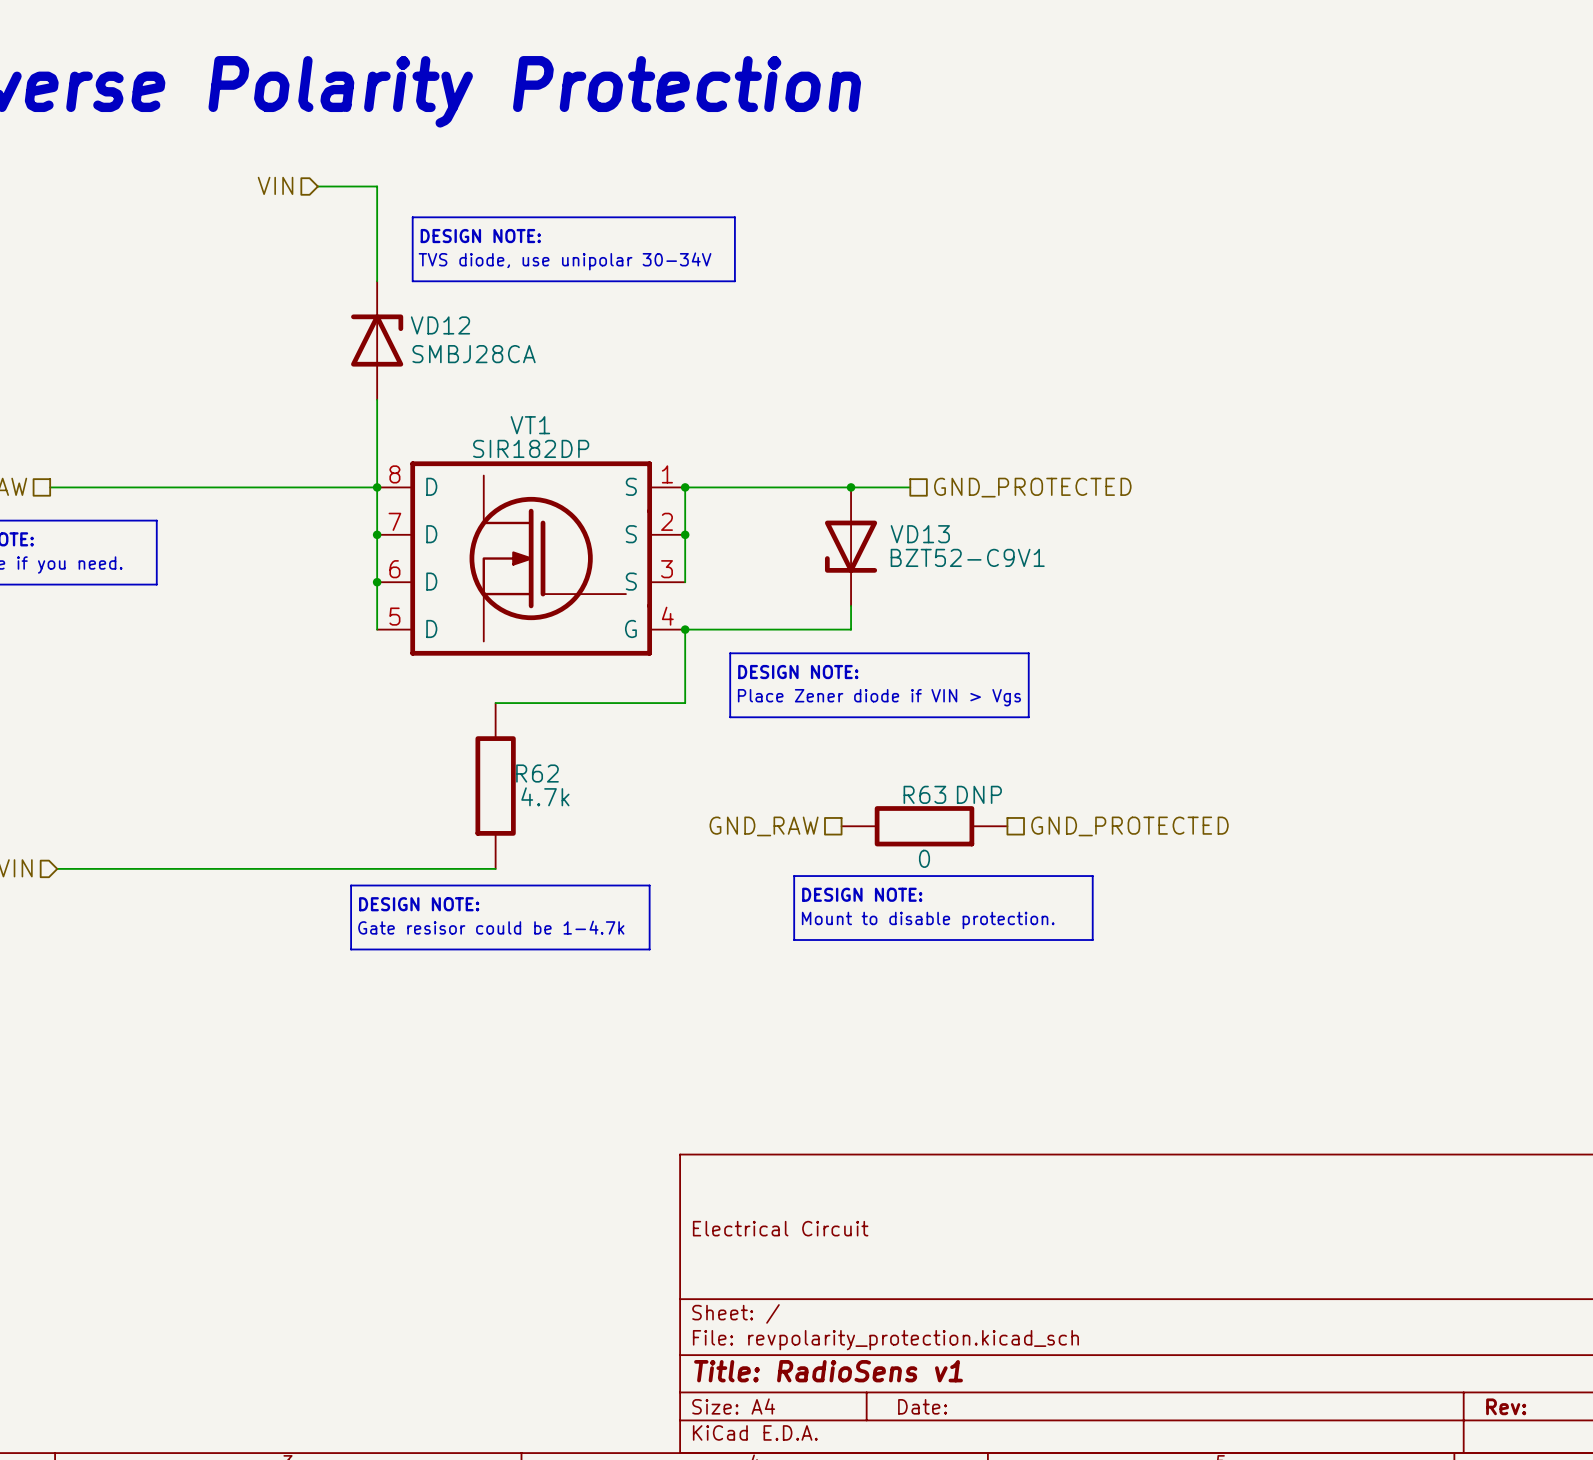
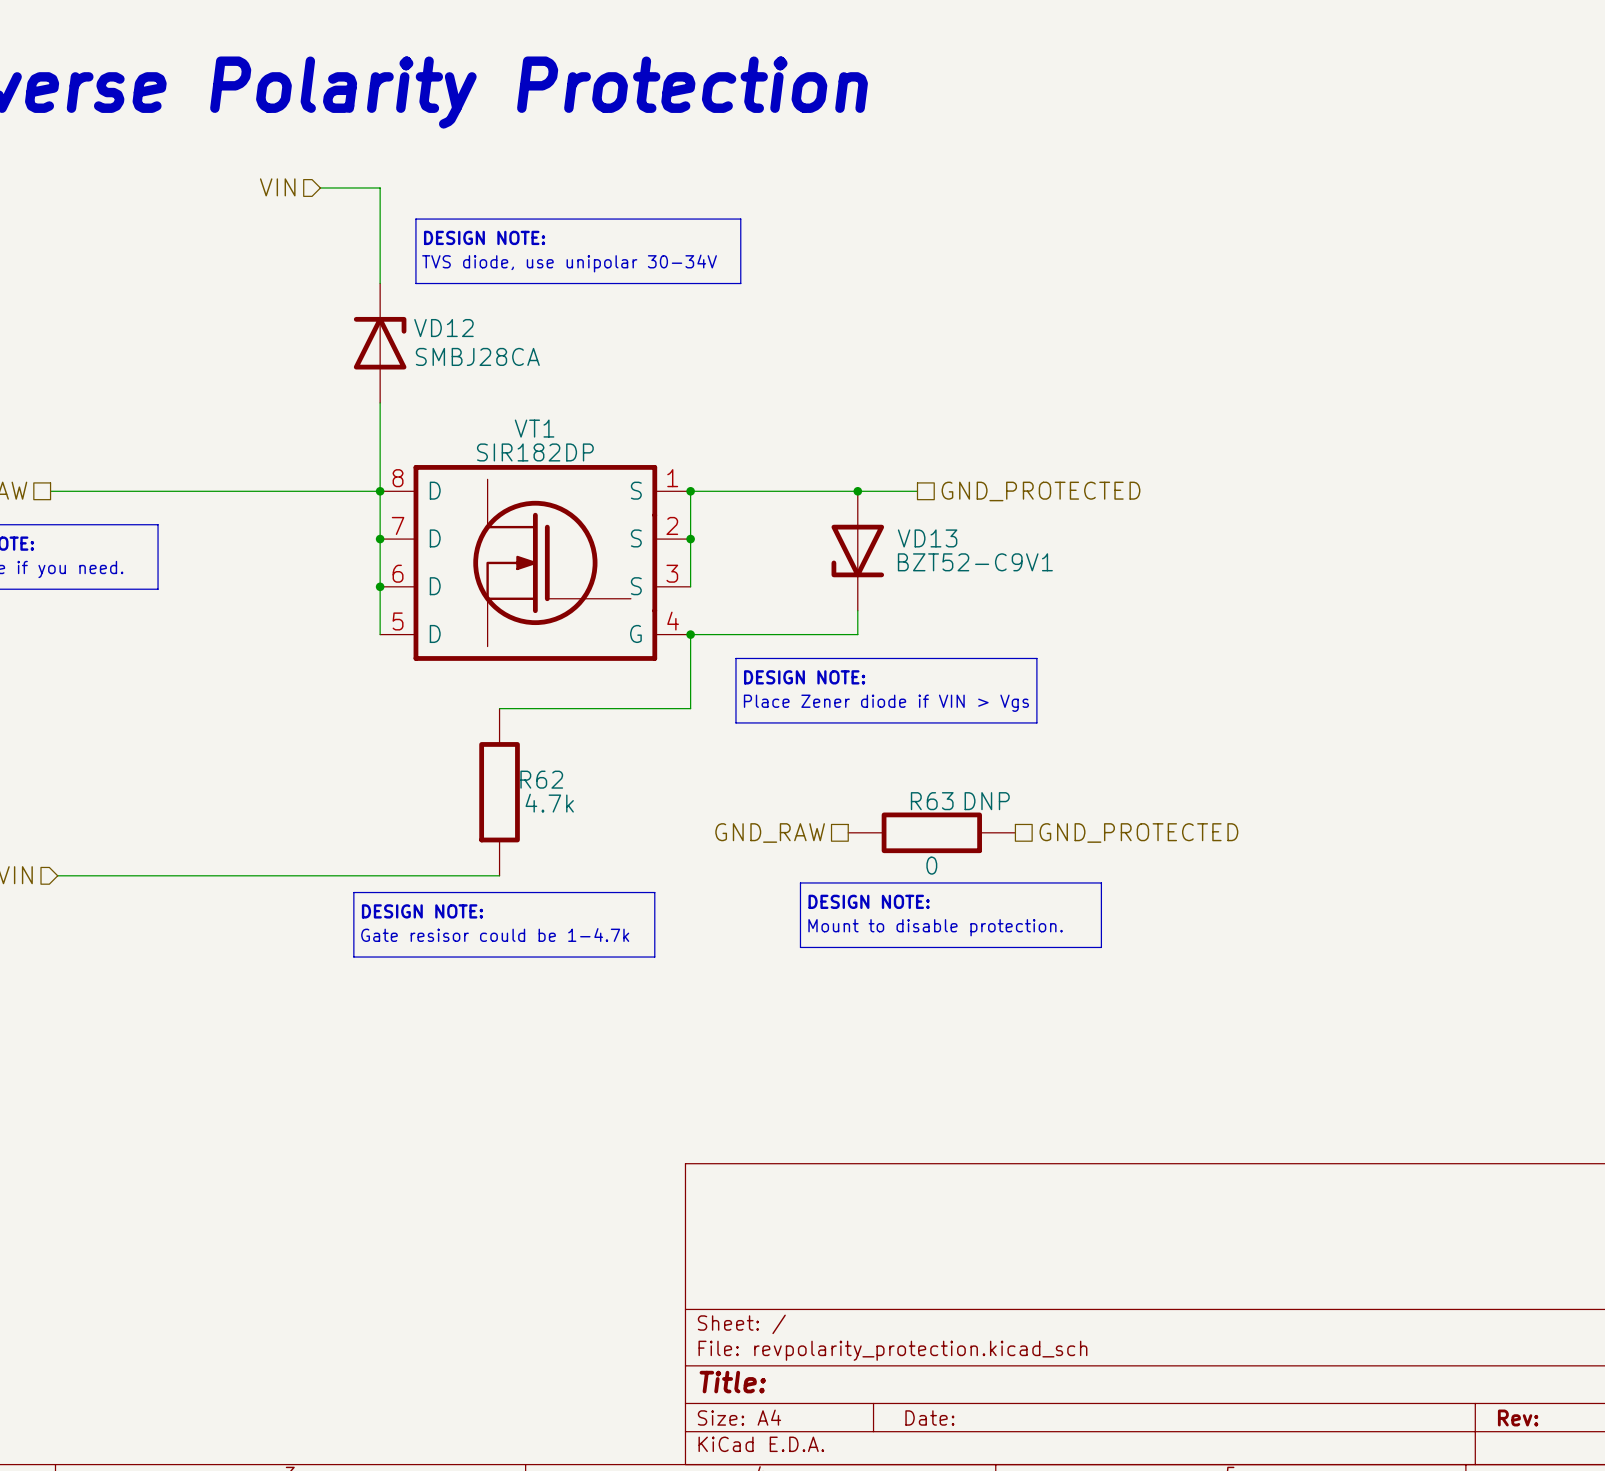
title block: Electrical Circuit (780, 1228) -> none
title block: Title: RadioSens v1 (828, 1371) -> Title: (732, 1382)

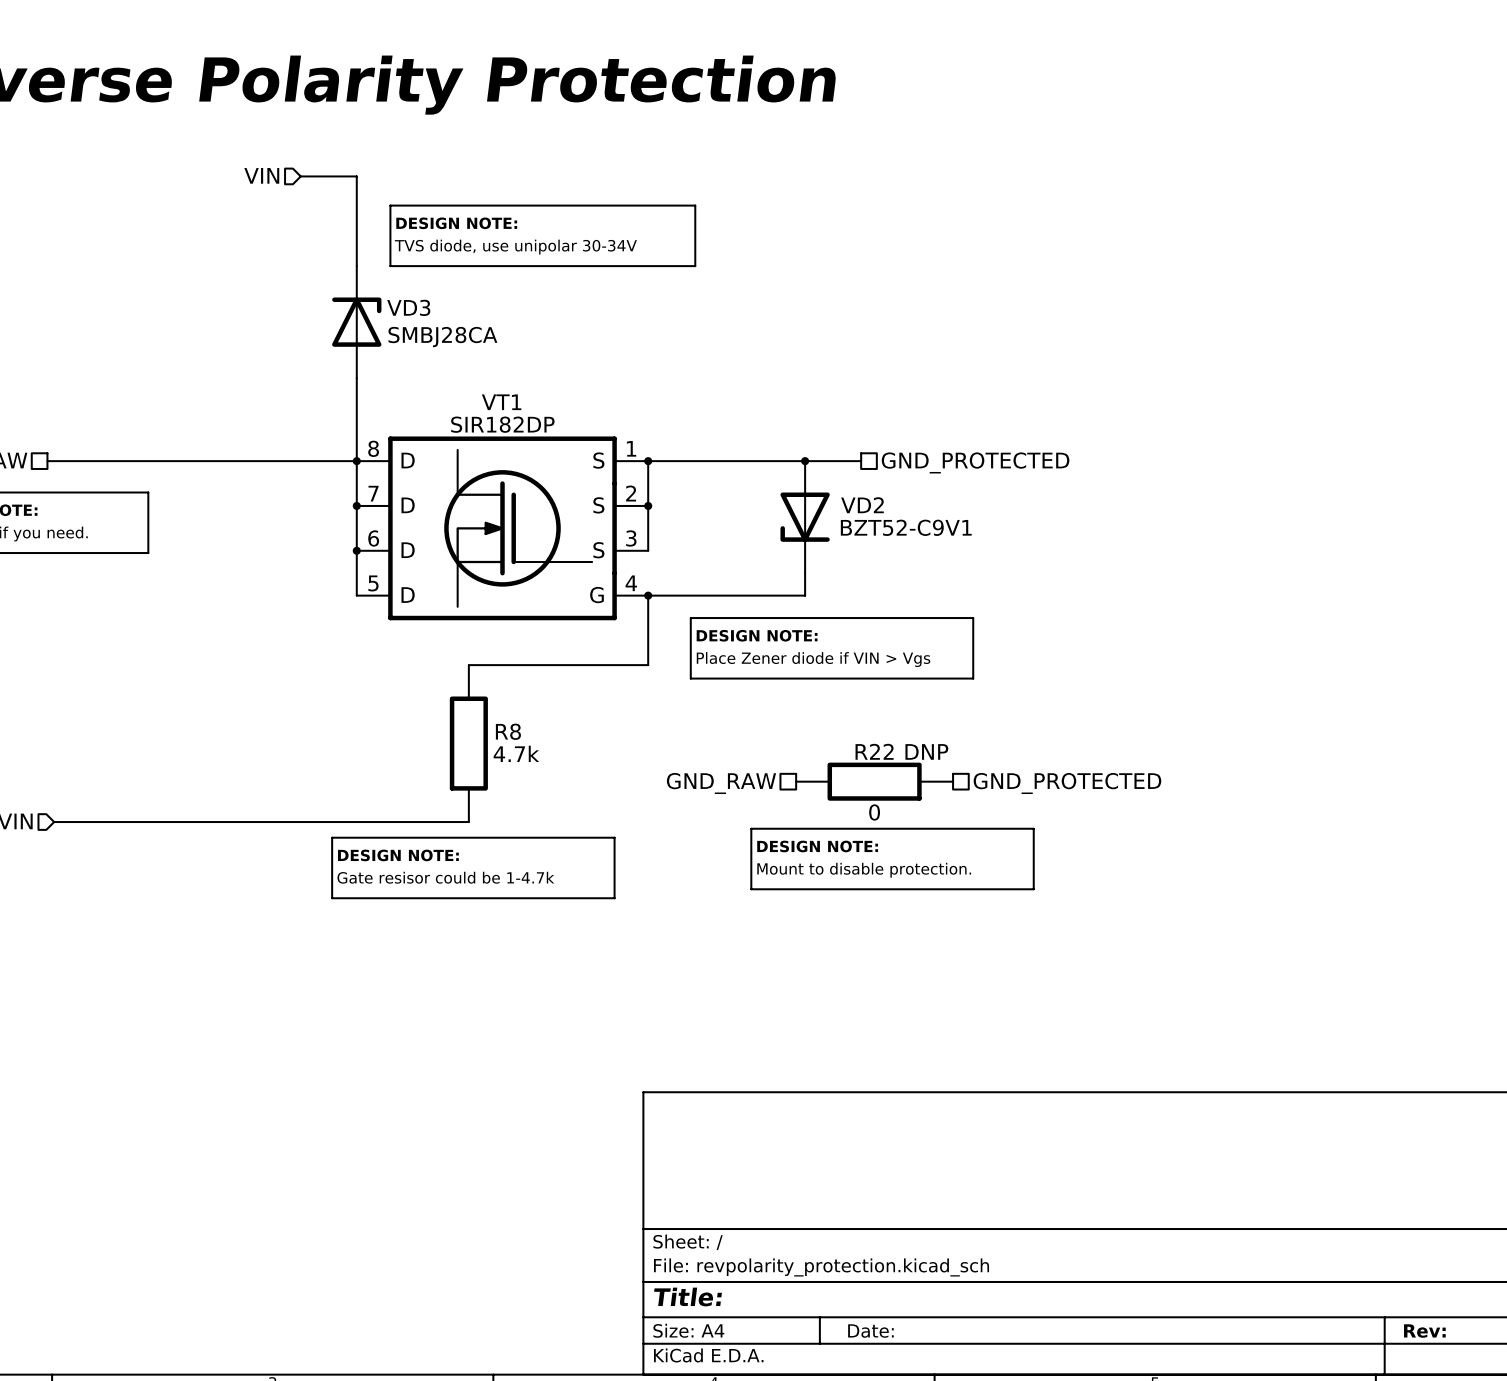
VD12 name: VD12 (443, 328) -> VD3 (408, 307)
VD13 name: VD13 (927, 538) -> VD2 (862, 505)
R62 name: R62 (541, 779) -> R8 (508, 731)
R63 name: R63 (932, 801) -> R22 (874, 751)

